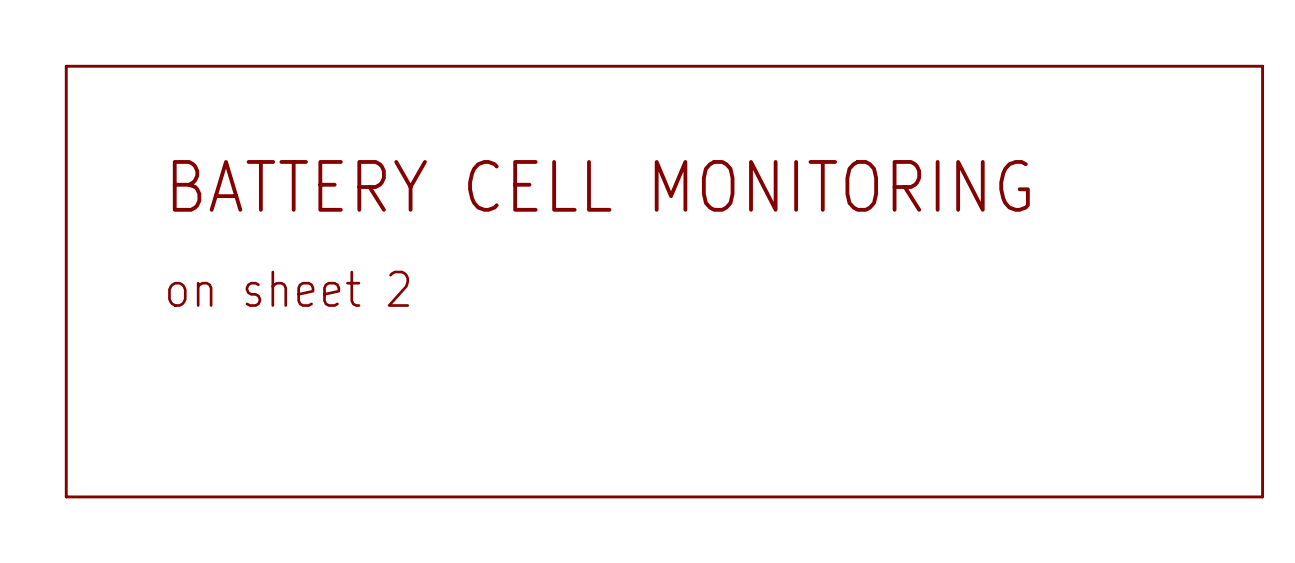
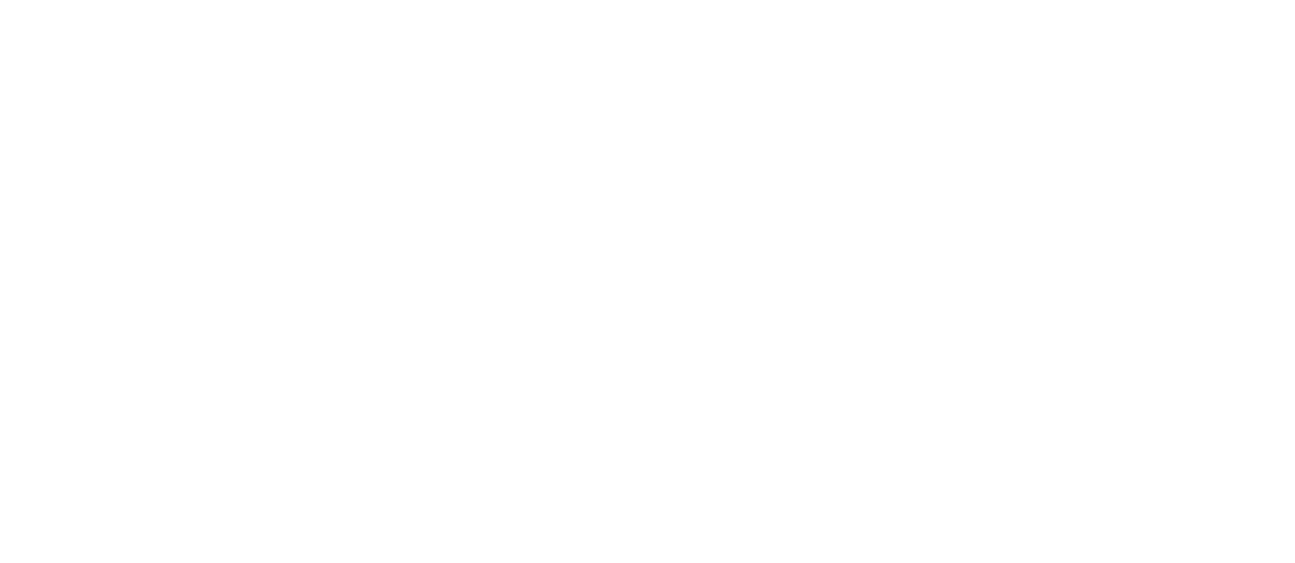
line: (66, 66) (1262, 66) (1262, 496) (66, 496) (66, 66) -> none
text: BATTERY CELL MONITORING (601, 185) -> none
text: on sheet 2 (288, 288) -> none

